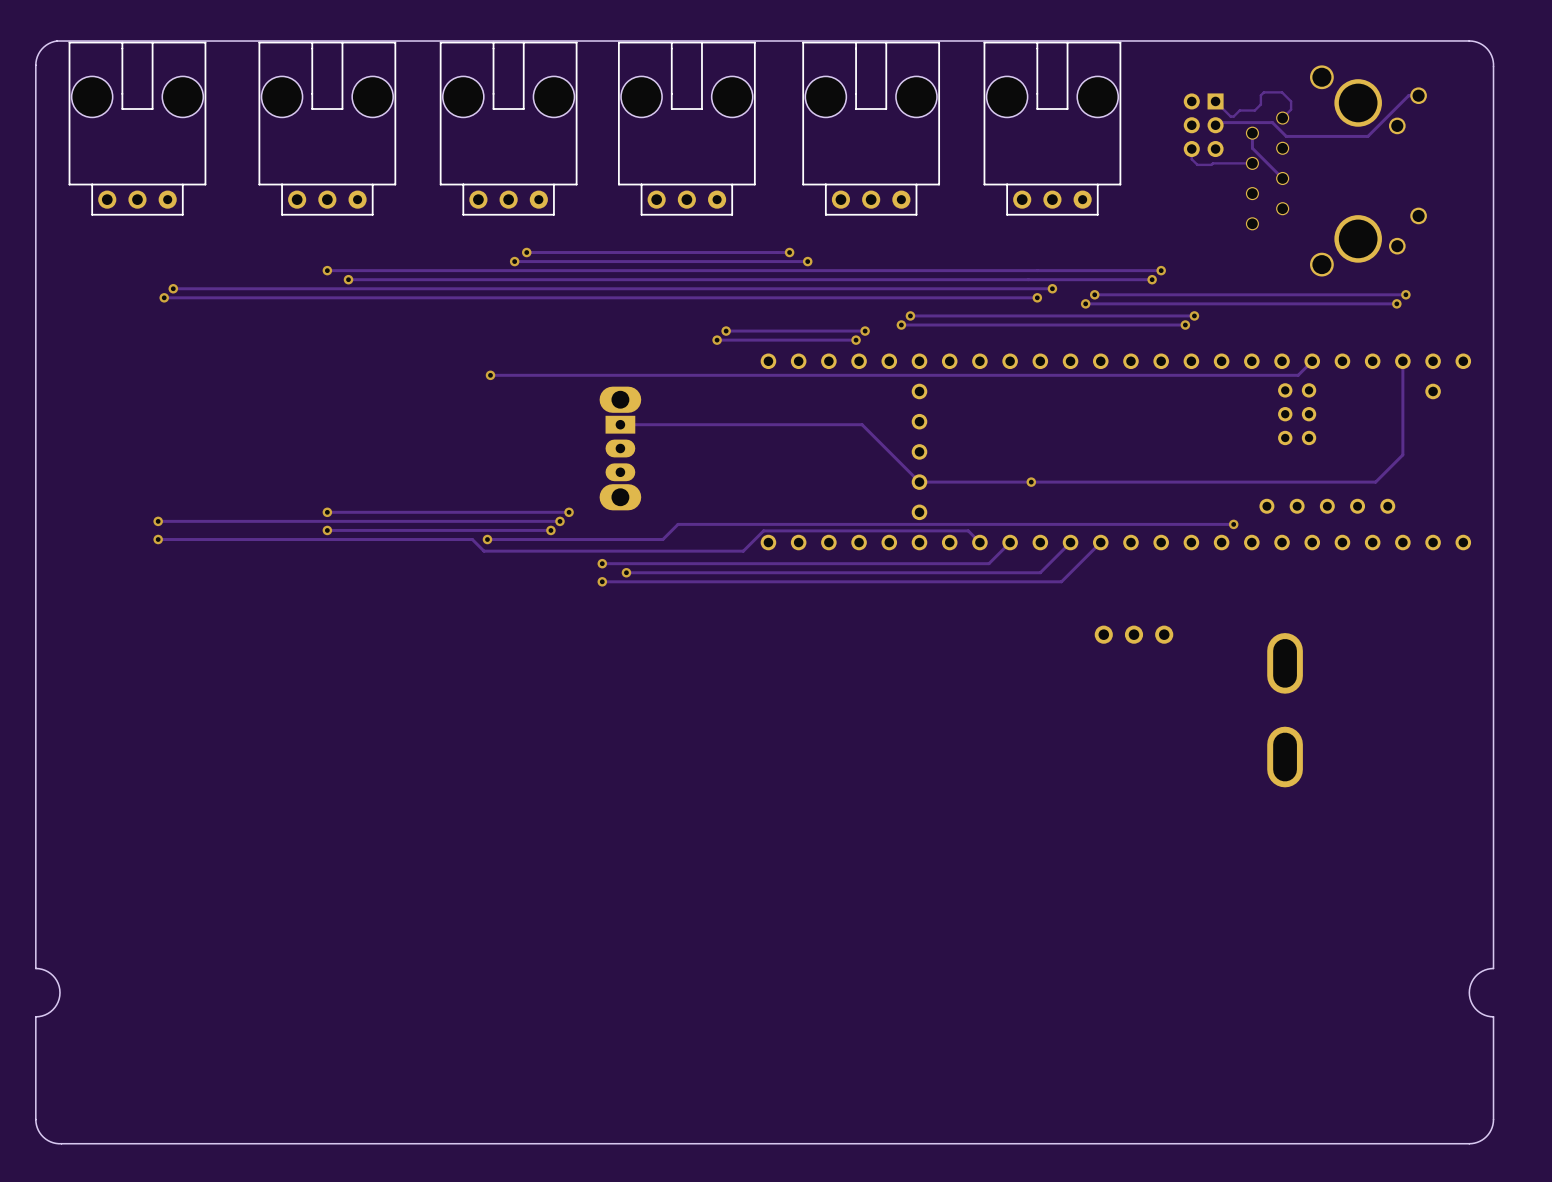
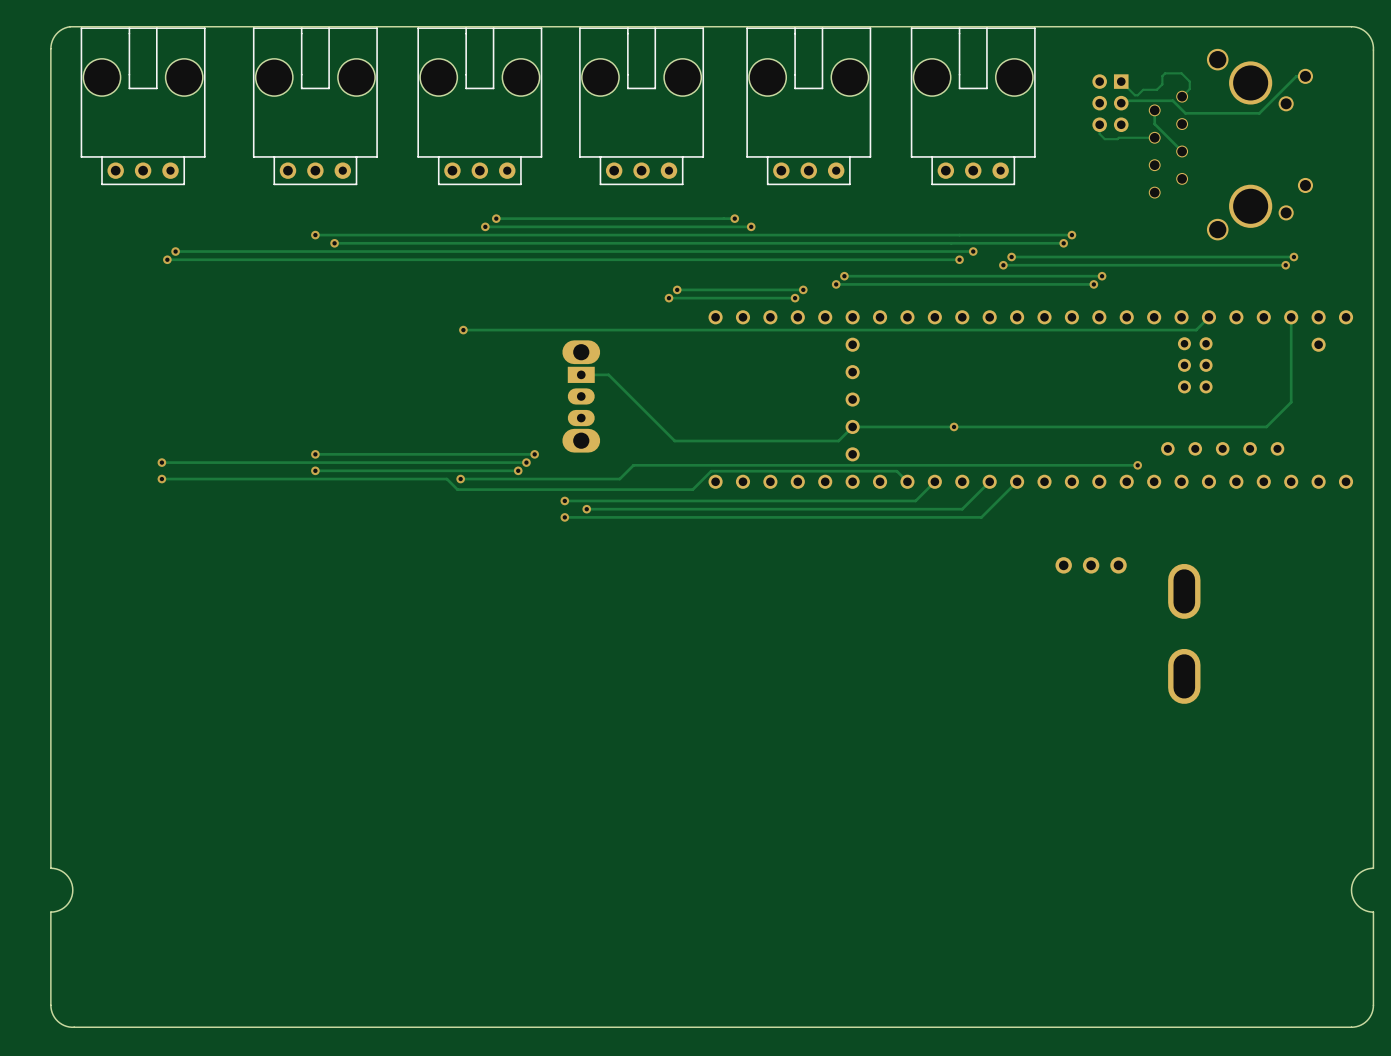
track: (650, 424) (862, 424) (919, 482) -> (608, 374) (674, 441) (838, 441) (852, 426)
part position: (1134, 634) -> (1091, 565)

